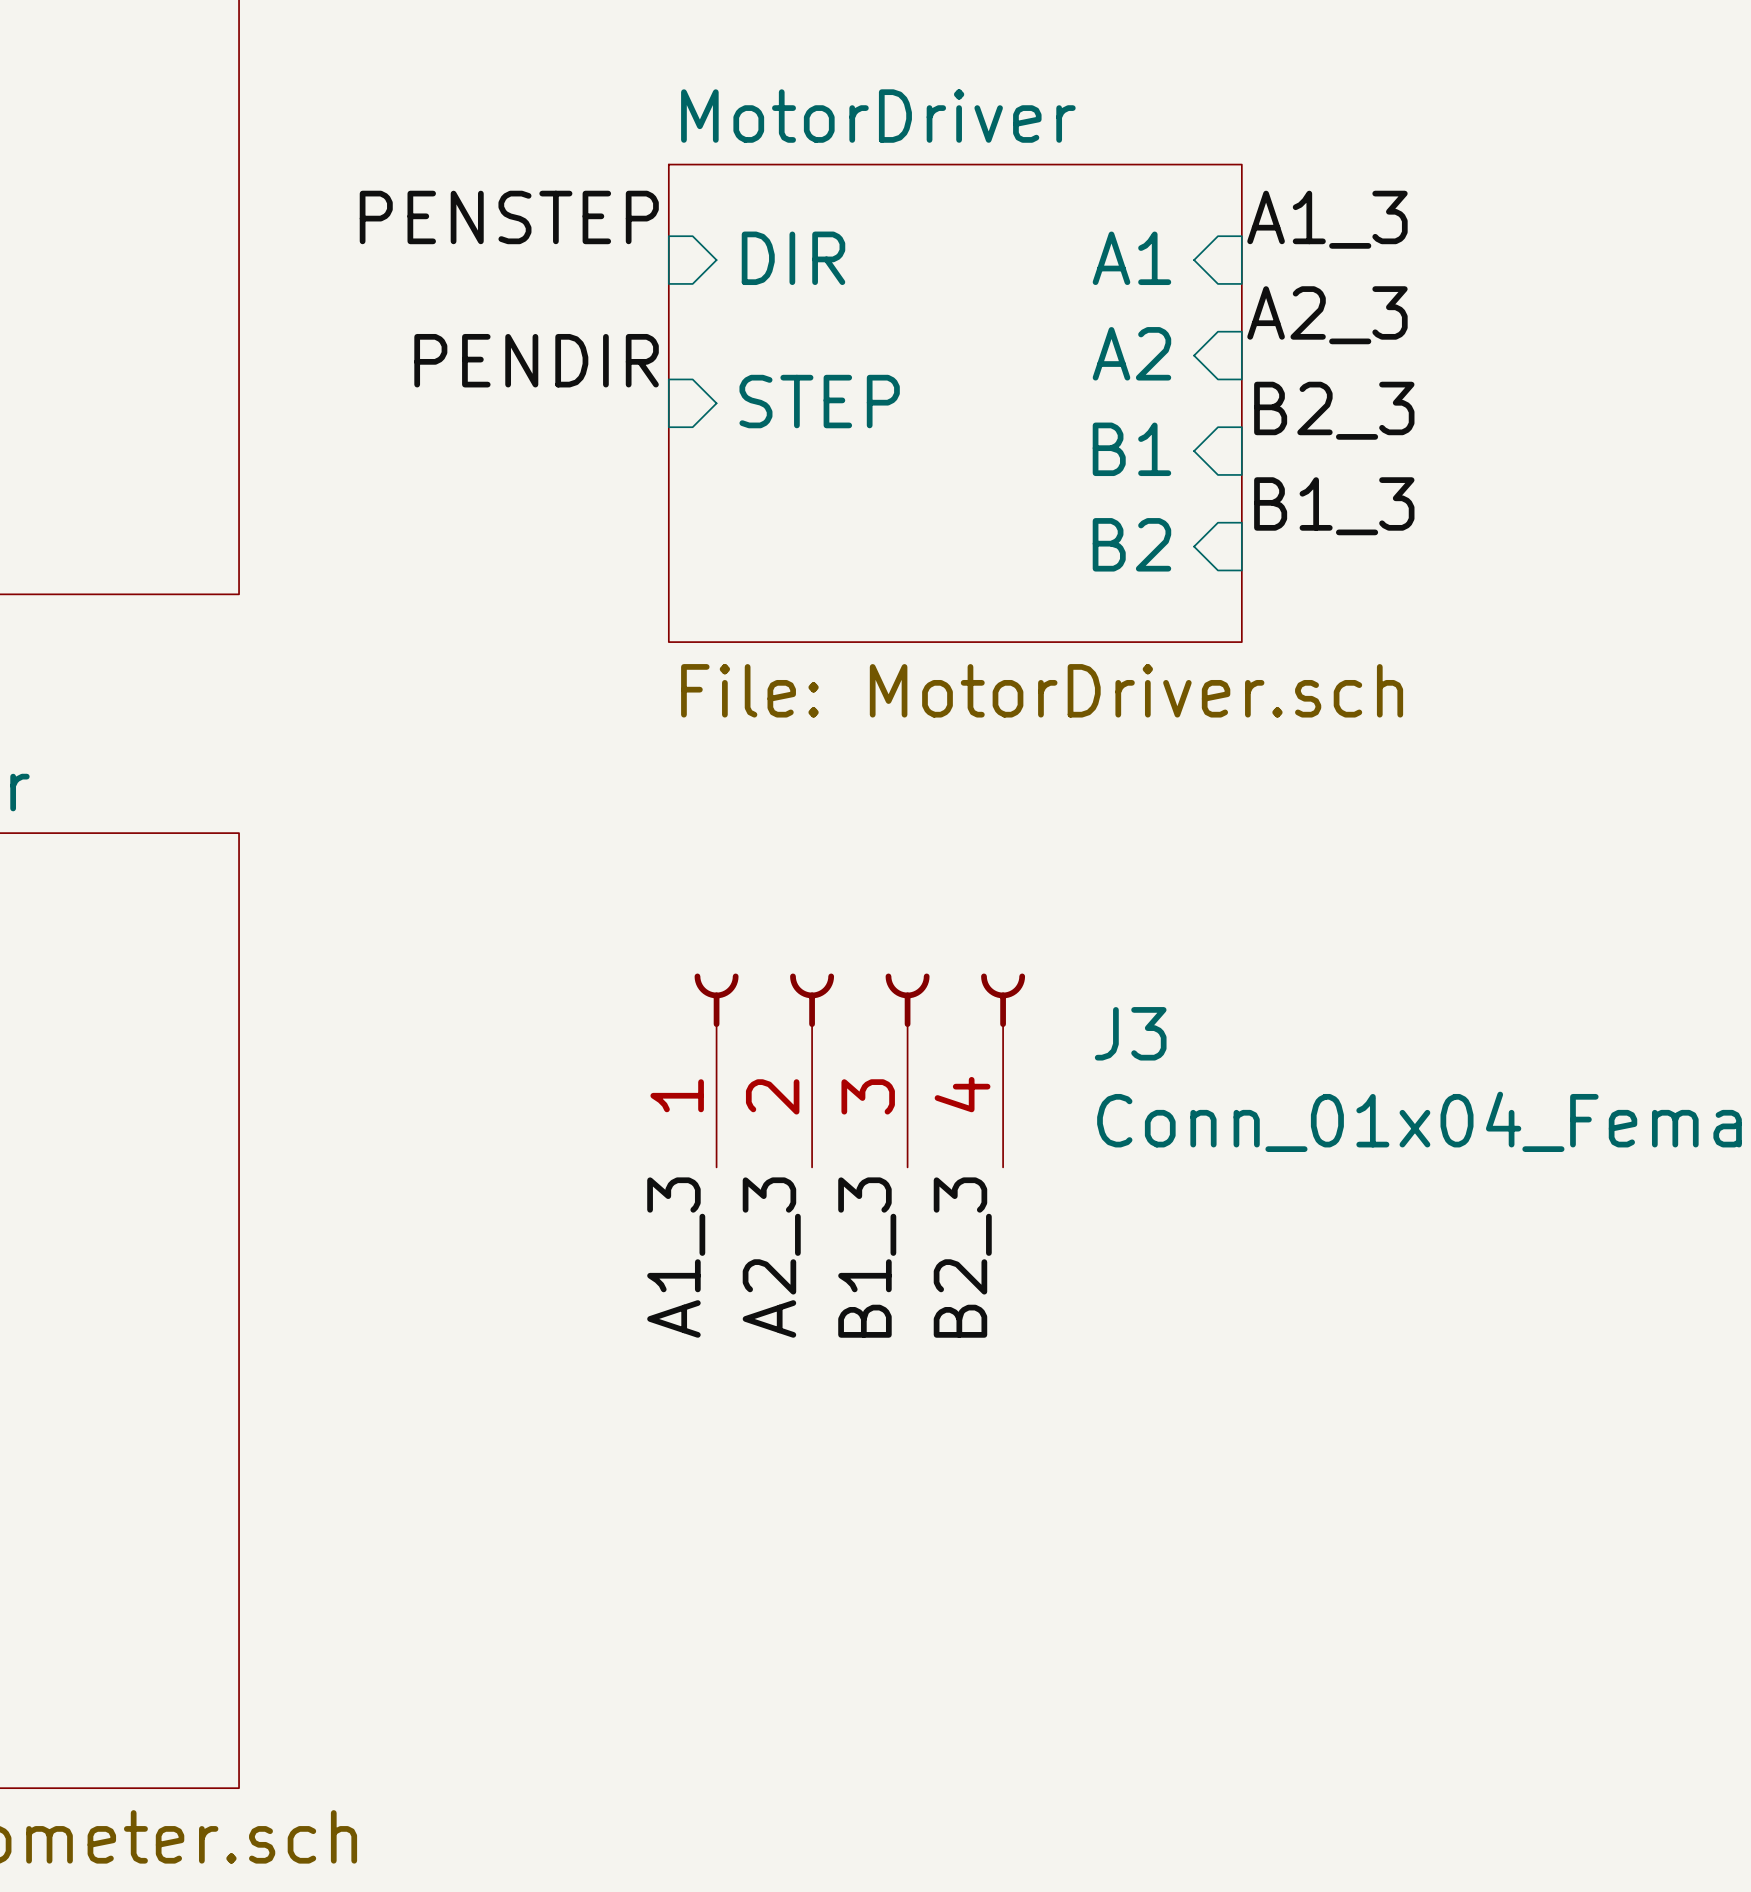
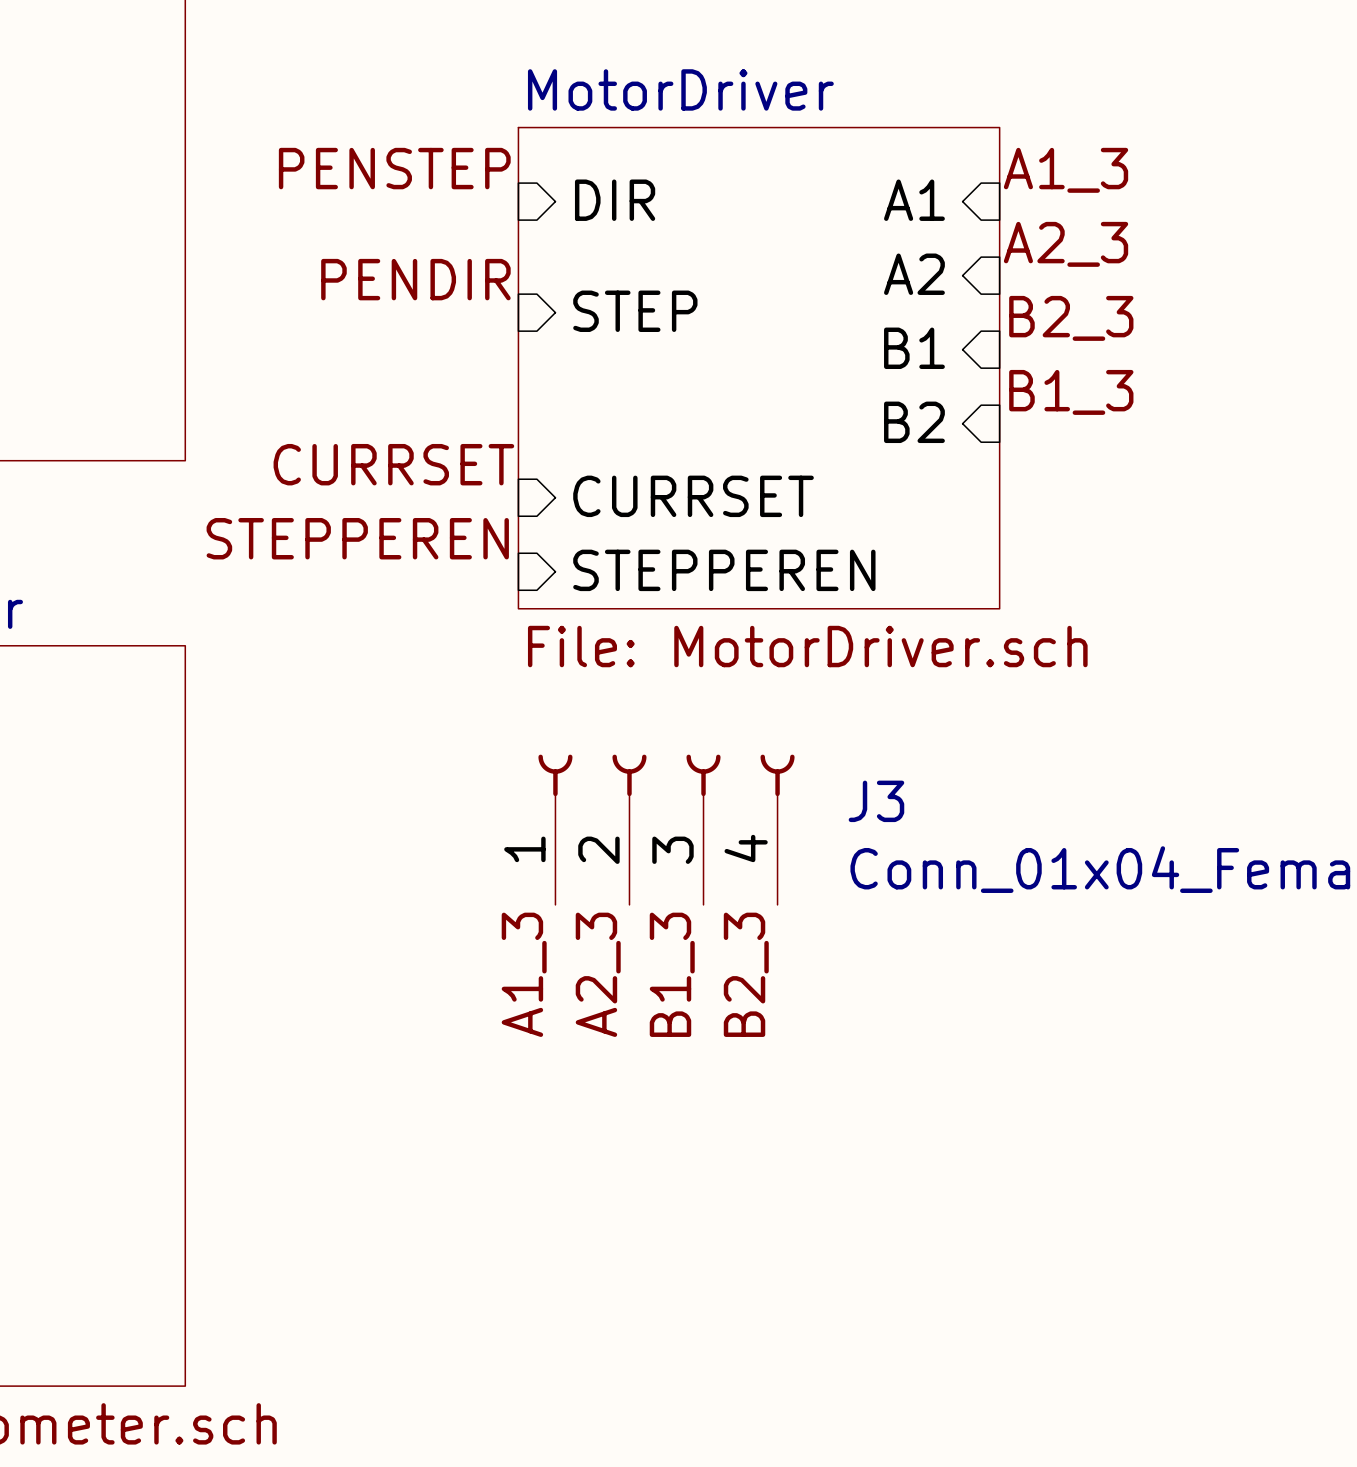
label position: A1_3 (1327, 219) -> A1_3 (1066, 170)
sheet pin position: A1 (1131, 258) -> A1 (914, 200)
label position: A2_3 (1327, 315) -> A2_3 (1066, 244)
sheet pin position: A2 (1131, 353) -> A2 (914, 274)
sheet MotorDriver: File: MotorDriver.sch (955, 403) -> none
label position: B2_3 (1334, 410) -> B2_3 (1071, 318)
sheet pin position: B1 (1131, 449) -> B1 (914, 348)
sheet MotorDriver: none -> File: MotorDriver.sch (759, 368)
label position: B1_3 (1334, 506) -> B1_3 (1071, 392)
sheet pin position: B2 (1131, 544) -> B2 (914, 422)
label: none -> CURRSET (393, 464)
sheet pin: none -> CURRSET (693, 496)
label: none -> STEPPEREN (357, 538)
sheet pin: none -> STEPPEREN (724, 570)

